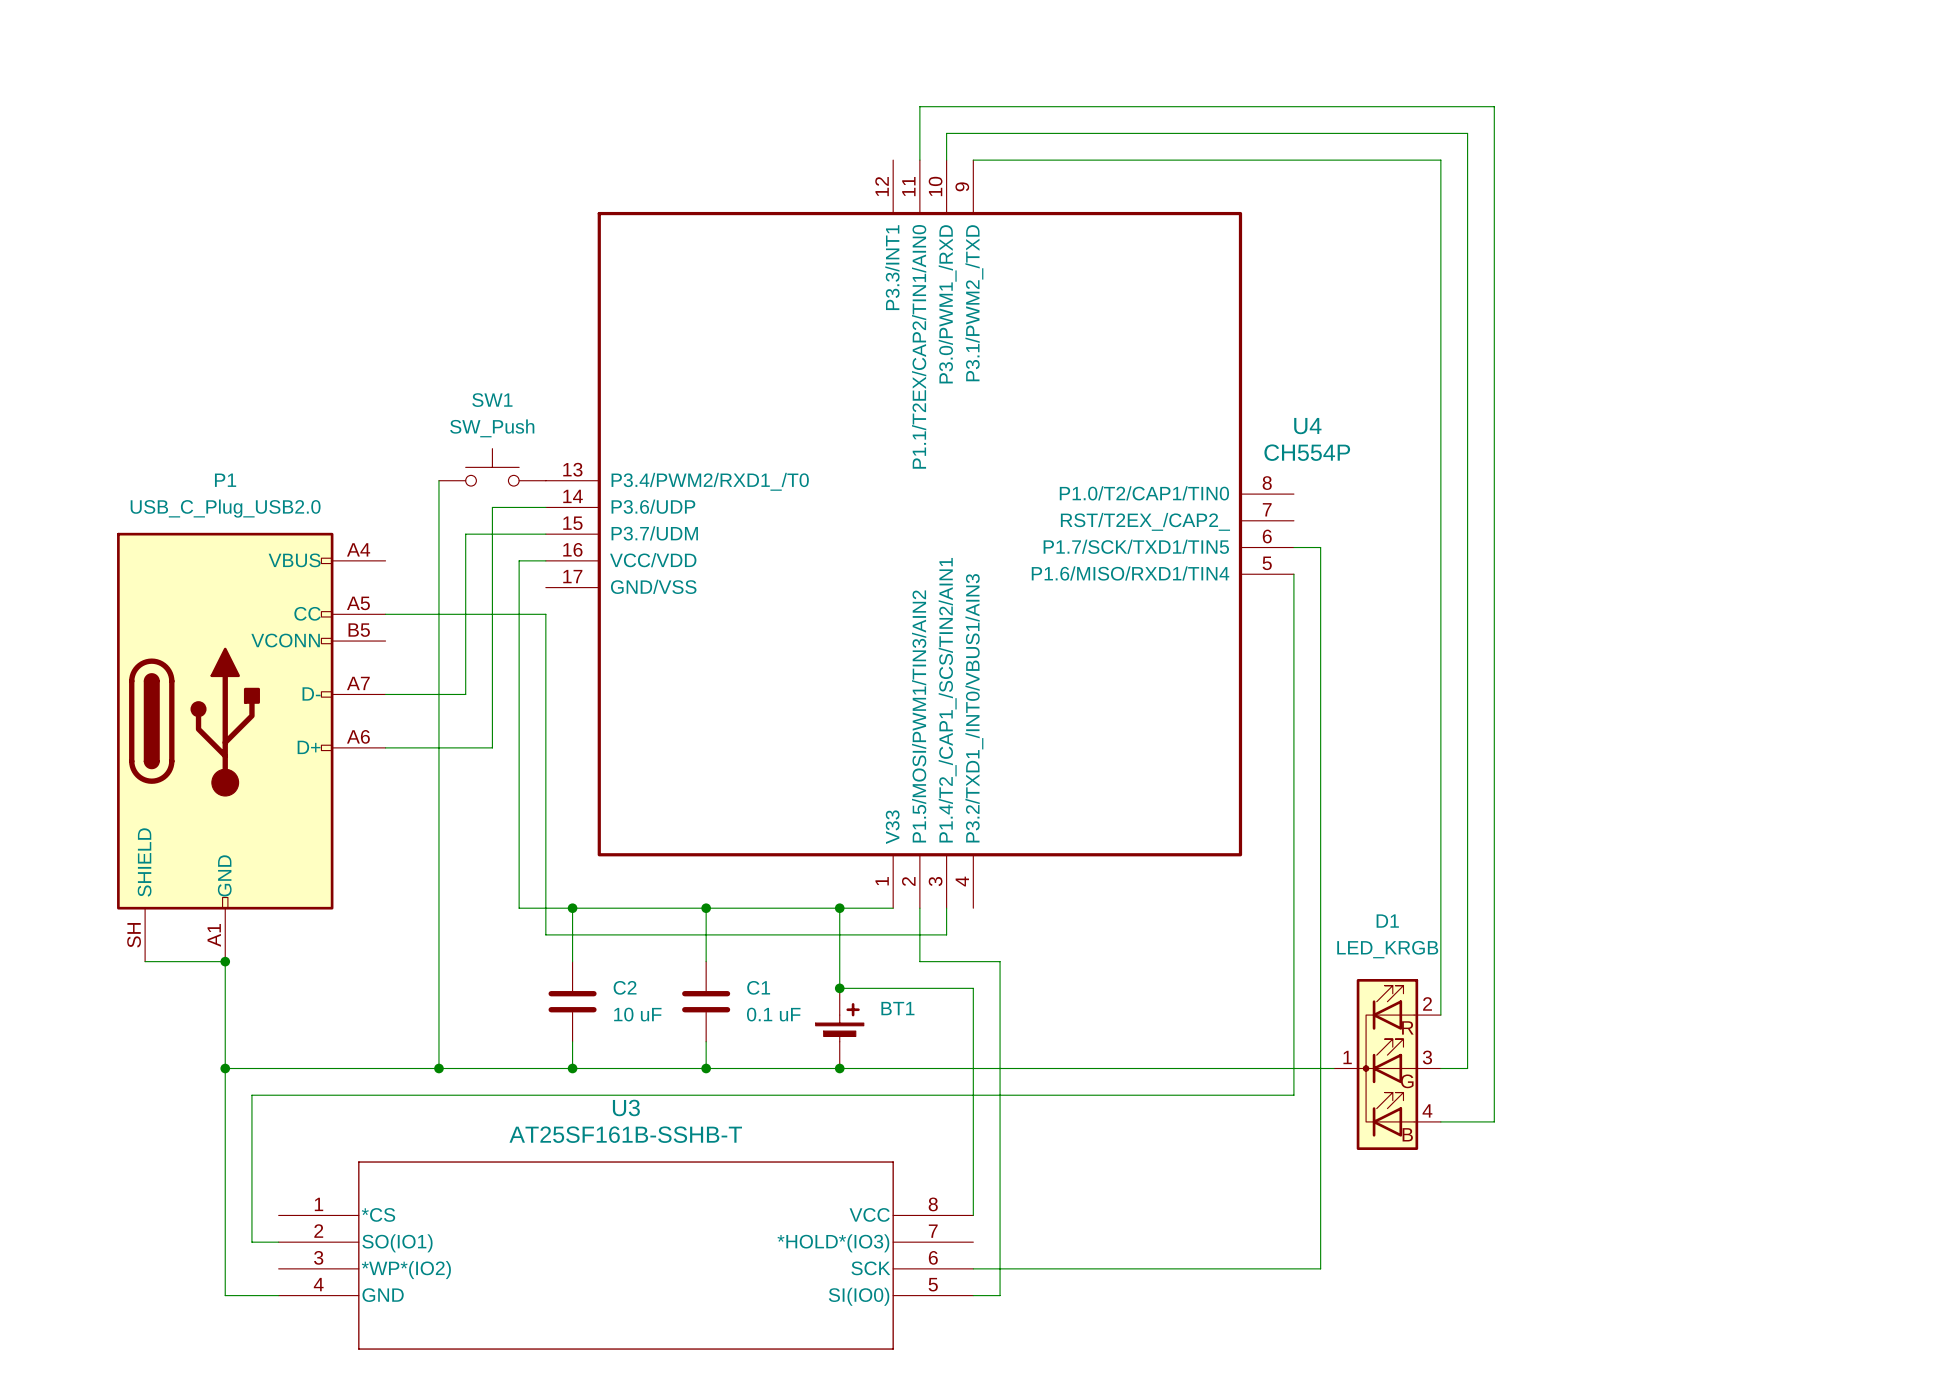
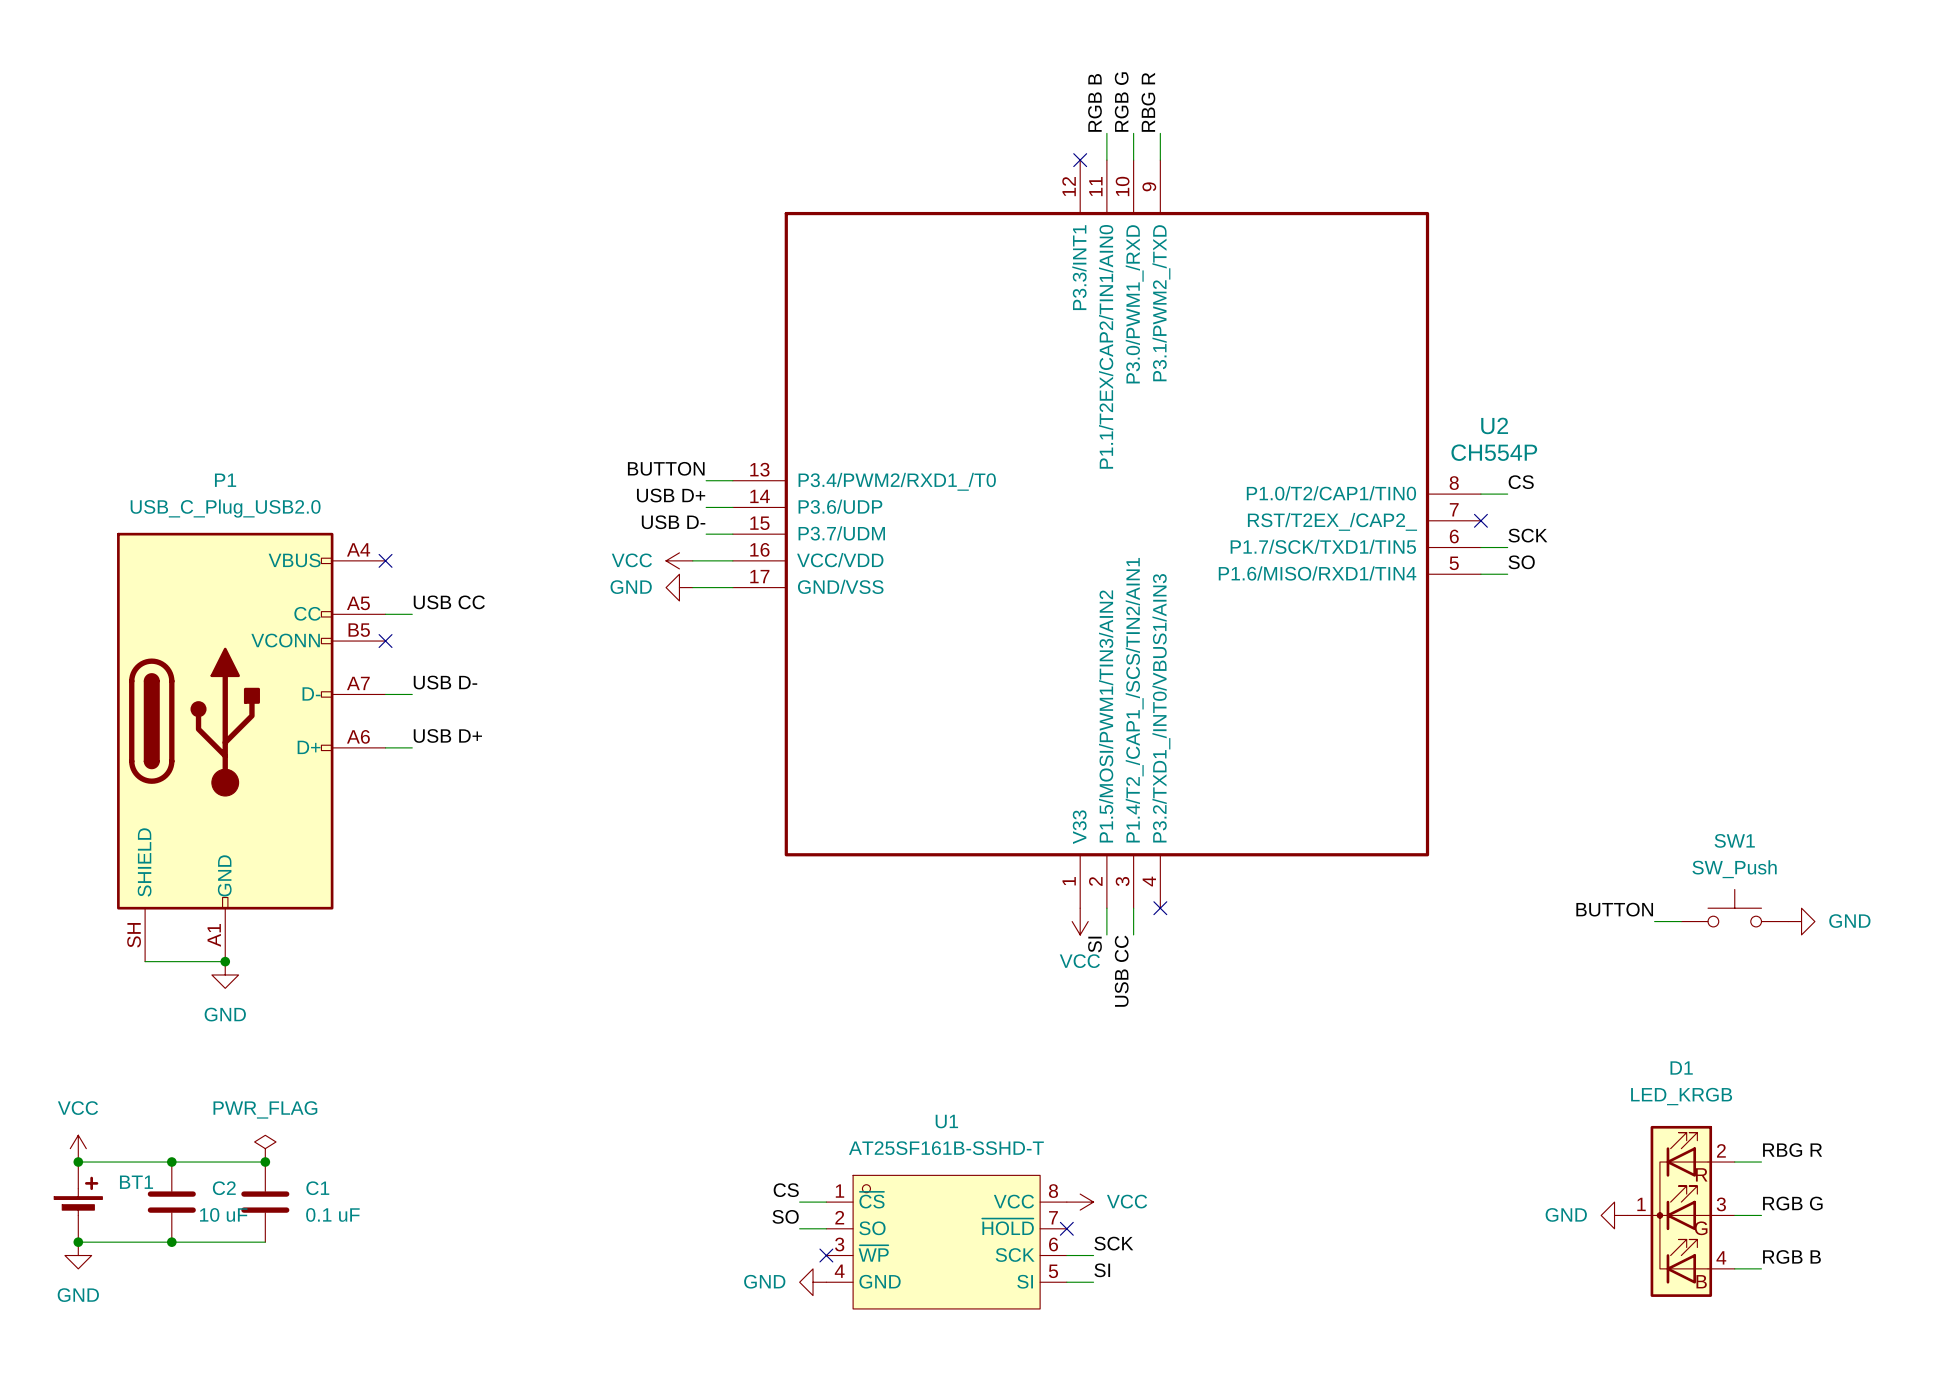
label: none -> RGB B (1094, 102)
label: none -> RGB G (1121, 102)
label: none -> RBG R (1148, 102)
wire: none -> (1106, 133) (1106, 160)
wire: none -> (1133, 133) (1133, 160)
wire: none -> (1160, 133) (1160, 160)
wire: (919, 160) (919, 106) (1494, 106) (1494, 1121) (1440, 1121) -> none
wire: (946, 160) (946, 133) (1467, 133) (1467, 1068) (1440, 1068) -> none
wire: (973, 160) (1440, 160) (1440, 1015) -> none
no-connect mark: none -> (1080, 160)
SW1 position: (492, 467) -> (1734, 908)
label: none -> BUTTON (666, 468)
wire: (438, 480) (438, 1068) -> none
wire: none -> (706, 480) (732, 480)
label: none -> CS (1521, 482)
wire: none -> (1480, 494) (1507, 494)
label: none -> USB D+ (671, 495)
wire: (545, 507) (492, 507) (492, 747) (412, 747) -> none
wire: none -> (706, 507) (732, 507)
no-connect mark: none -> (1480, 520)
label: none -> USB D- (673, 522)
wire: (545, 534) (465, 534) (465, 694) (412, 694) -> none
wire: none -> (706, 534) (732, 534)
U4: CH554P (919, 534) -> none
U2: none -> CH554P (1106, 534)
label: none -> SCK (1527, 535)
wire: (1293, 547) (1320, 547) (1320, 1268) (973, 1268) -> none
wire: none -> (1480, 547) (1507, 547)
no-connect mark: none -> (385, 560)
wire: (545, 560) (519, 560) (519, 908) (893, 908) -> none
power symbol: none -> VCC (679, 560)
wire: none -> (692, 560) (732, 560)
label: none -> SO (1521, 562)
wire: (1293, 574) (1293, 1095) (251, 1095) (251, 1242) -> (78, 1242) (251, 1242)
wire: none -> (1480, 574) (1507, 574)
power symbol: none -> GND (679, 587)
wire: none -> (692, 587) (732, 587)
label: none -> USB CC (449, 602)
wire: (412, 614) (545, 614) (545, 934) (946, 934) (946, 908) -> none
no-connect mark: none -> (385, 641)
label: none -> USB D- (445, 682)
label: none -> USB D+ (447, 735)
wire: (572, 908) (572, 961) -> none
junction: (572, 908) -> none
wire: (706, 908) (706, 961) -> none
junction: (706, 908) -> none
wire: (839, 908) (839, 988) (973, 988) (973, 1215) -> none
junction: (839, 908) -> none
wire: (919, 908) (919, 961) (1000, 961) (1000, 1295) (973, 1295) -> none
wire: none -> (1106, 908) (1106, 934)
wire: none -> (1133, 908) (1133, 934)
no-connect mark: none -> (1160, 908)
label: none -> BUTTON (1614, 909)
power symbol: none -> VCC (1080, 921)
wire: none -> (1654, 921) (1681, 921)
power symbol: none -> GND (1801, 921)
label: none -> SI (1094, 944)
wire: (225, 961) (225, 1295) (278, 1295) -> none
label: none -> USB CC (1121, 971)
power symbol: none -> GND (225, 974)
junction: (839, 988) -> none
C2 position: (572, 1001) -> (171, 1202)
C1 position: (706, 1001) -> (265, 1202)
C2 value position: 10 uF (637, 1014) -> 10 uF (223, 1214)
BT1 position: (839, 1028) -> (78, 1202)
wire: (572, 1041) (572, 1068) -> none
wire: (706, 1041) (706, 1068) -> none
D1 position: (1387, 1064) -> (1681, 1211)
wire: (225, 1068) (1334, 1068) -> none
junction: (225, 1068) -> none
junction: (438, 1068) -> none
junction: (572, 1068) -> none
junction: (706, 1068) -> none
junction: (839, 1068) -> none
power symbol: none -> VCC (78, 1148)
power symbol: none -> PWR_FLAG (265, 1148)
label: none -> RBG R (1792, 1150)
wire: none -> (78, 1162) (265, 1162)
junction: none -> (78, 1162)
junction: none -> (171, 1162)
junction: none -> (265, 1162)
wire: none -> (1734, 1162) (1761, 1162)
label: none -> CS (786, 1190)
wire: none -> (799, 1202) (826, 1202)
power symbol: none -> VCC (1080, 1202)
label: none -> RGB G (1792, 1203)
power symbol: none -> GND (1614, 1215)
wire: none -> (1734, 1215) (1761, 1215)
label: none -> SO (785, 1216)
wire: none -> (799, 1228) (826, 1228)
no-connect mark: none -> (1066, 1228)
junction: none -> (78, 1242)
junction: none -> (171, 1242)
wire: (265, 1242) (278, 1242) -> none
U1: none -> AT25SF161B-SSHD-T (946, 1242)
label: none -> SCK (1113, 1243)
power symbol: none -> GND (78, 1255)
U3: AT25SF161B-SSHB-T (626, 1255) -> none
no-connect mark: none -> (826, 1255)
wire: none -> (1066, 1255) (1093, 1255)
label: none -> RGB B (1791, 1256)
wire: none -> (1734, 1268) (1761, 1268)
label: none -> SI (1102, 1270)
power symbol: none -> GND (813, 1282)
wire: none -> (1066, 1282) (1093, 1282)

